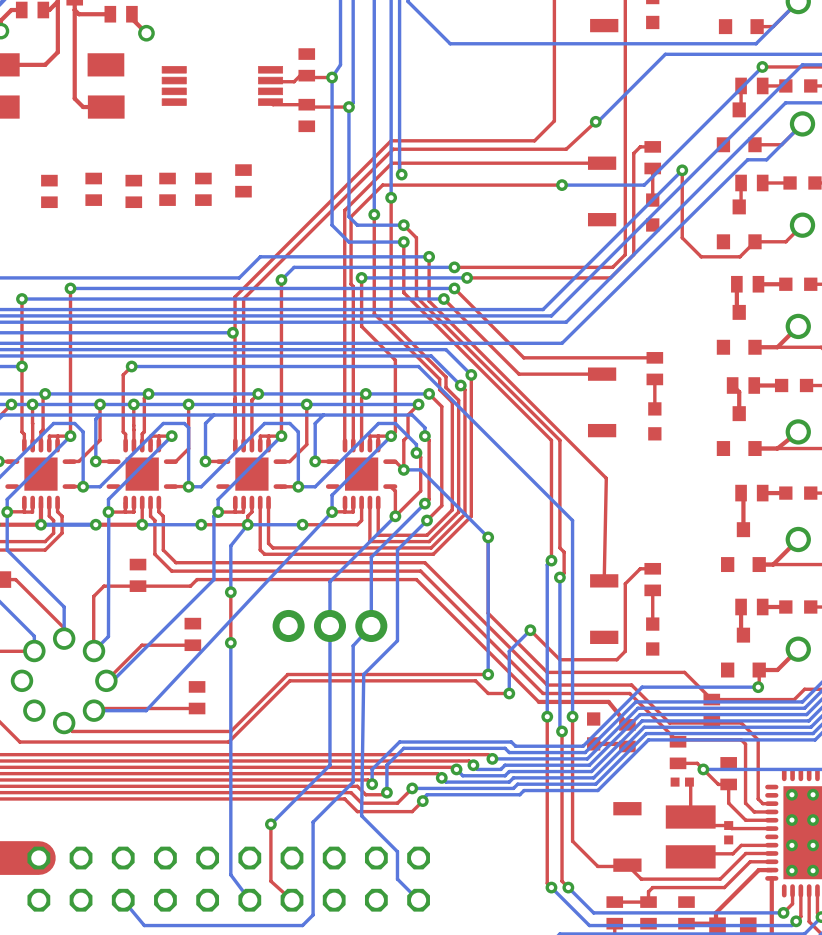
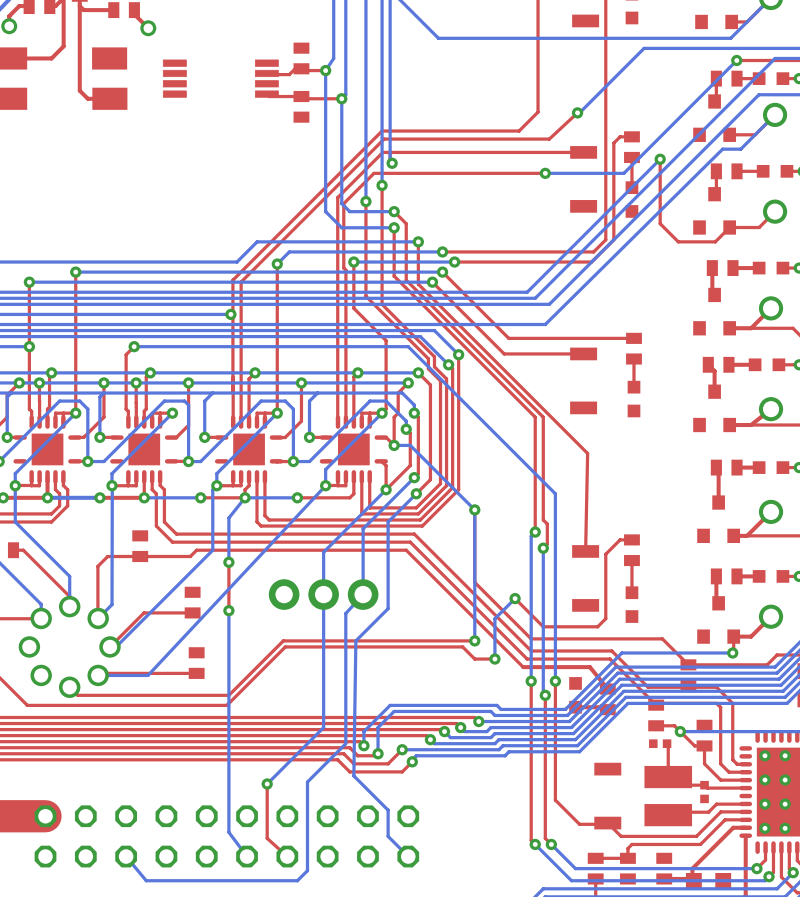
part: (243, 180) -> none
part: (93, 189) -> none
part: (167, 189) -> none
part: (203, 189) -> none
part: (49, 191) -> none
part: (133, 191) -> none

